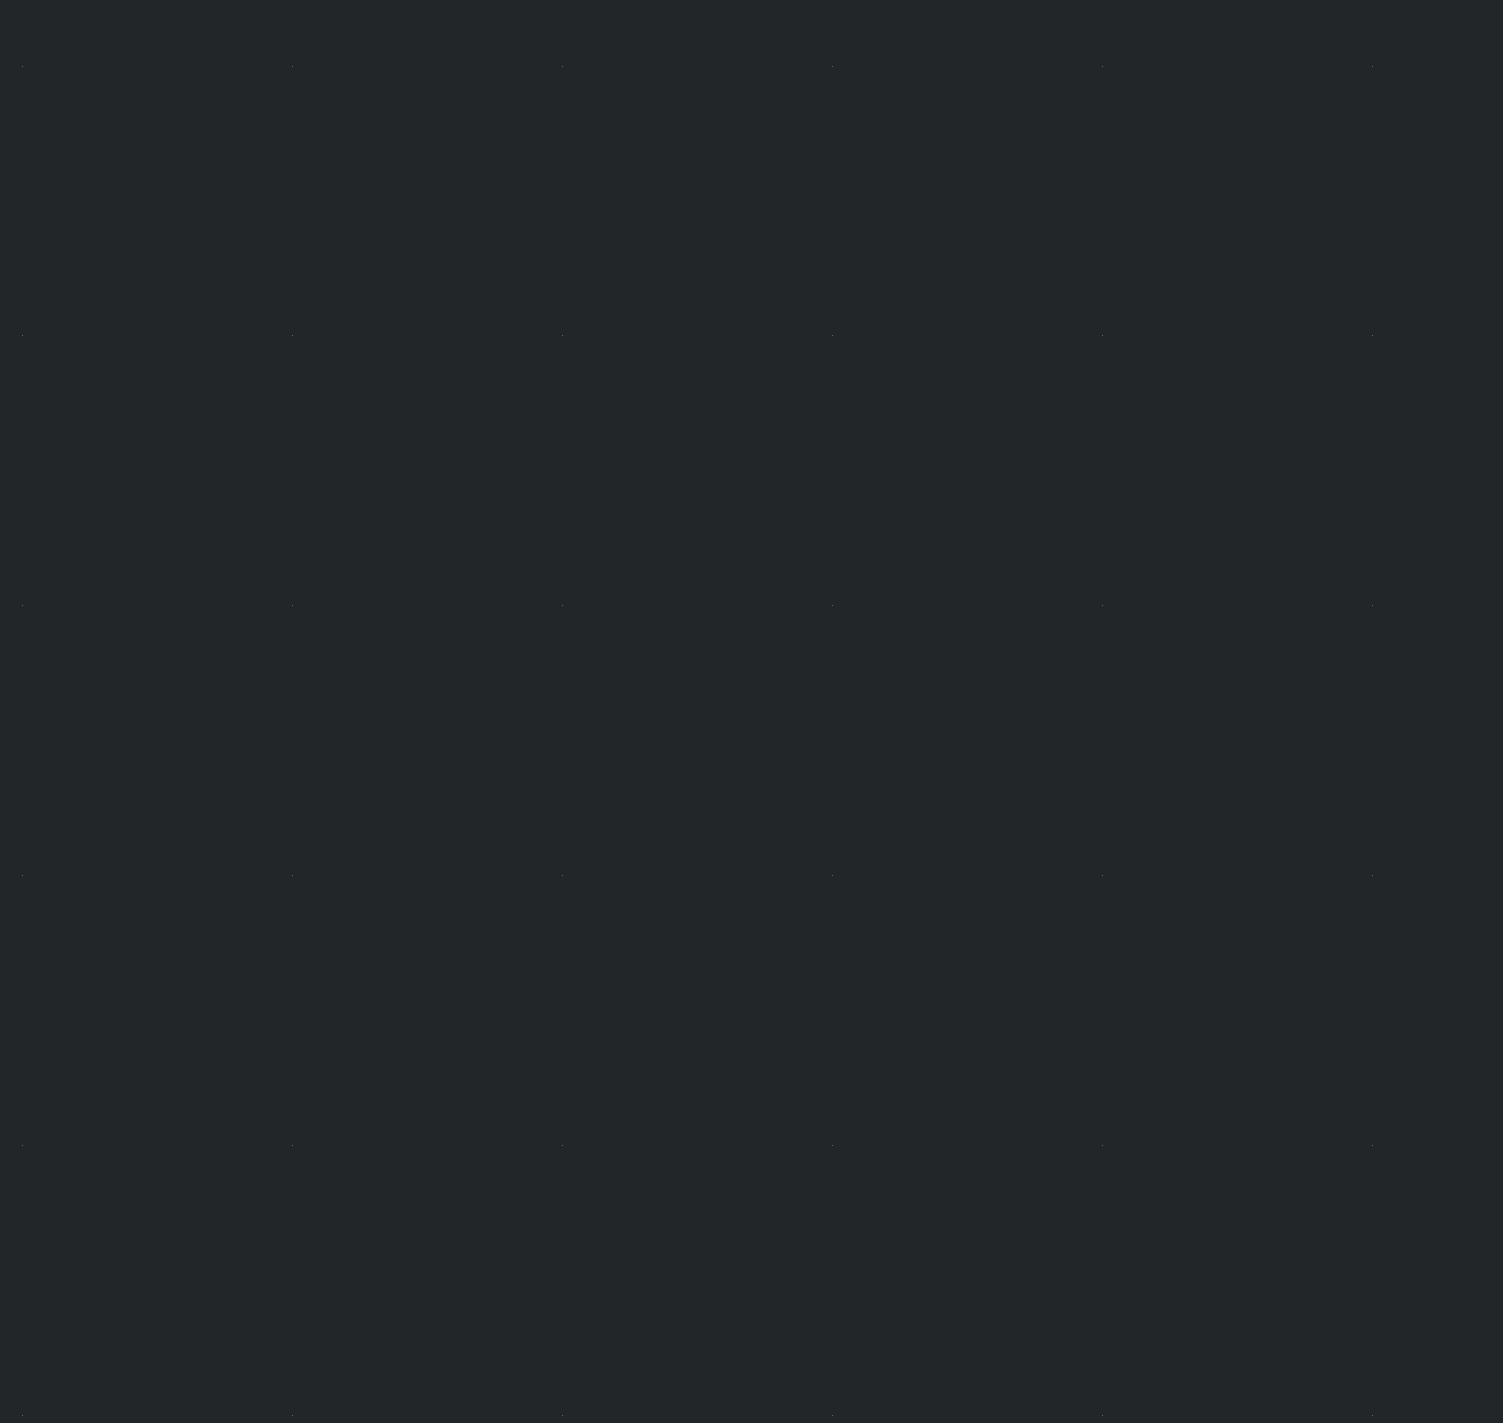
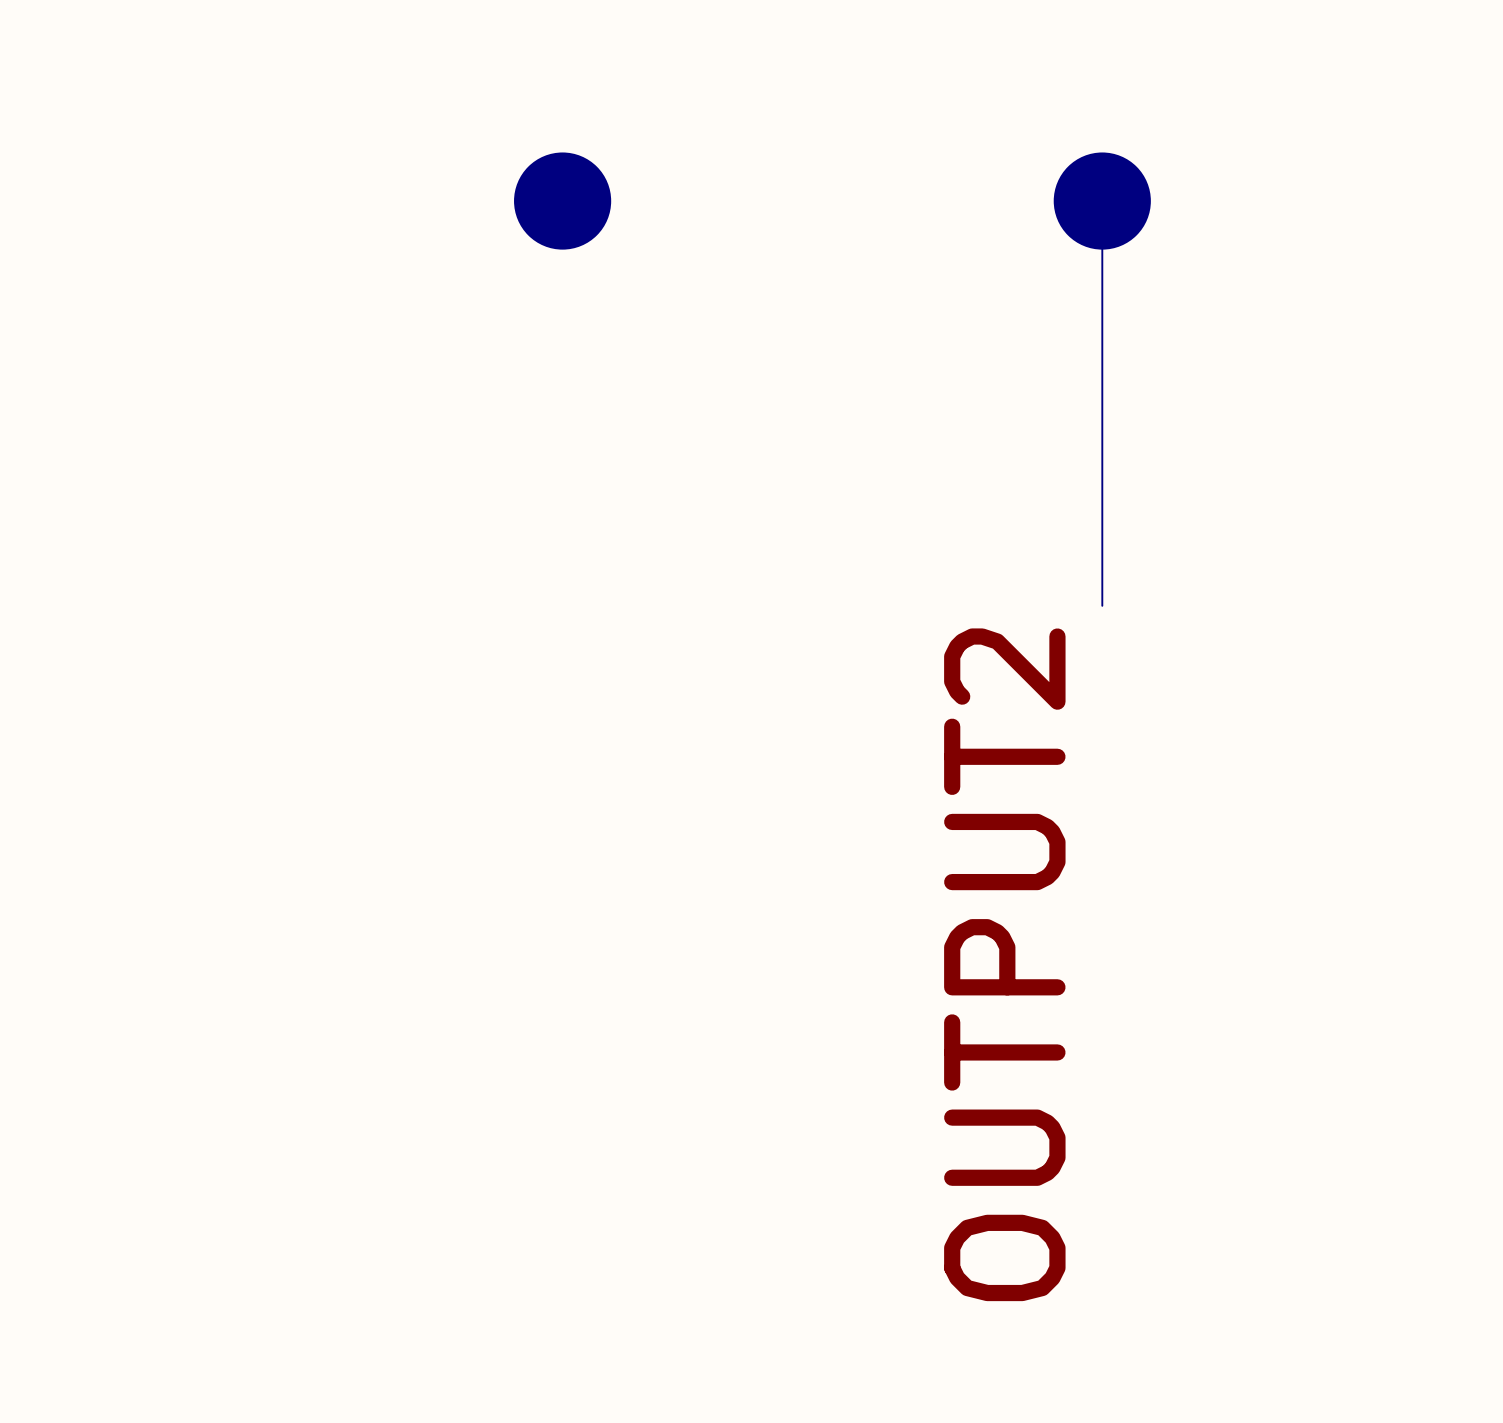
junction: none -> (562, 201)
wire: none -> (1102, 201) (1102, 605)
junction: none -> (1102, 201)
label: none -> OUTPUT2 (1004, 964)

